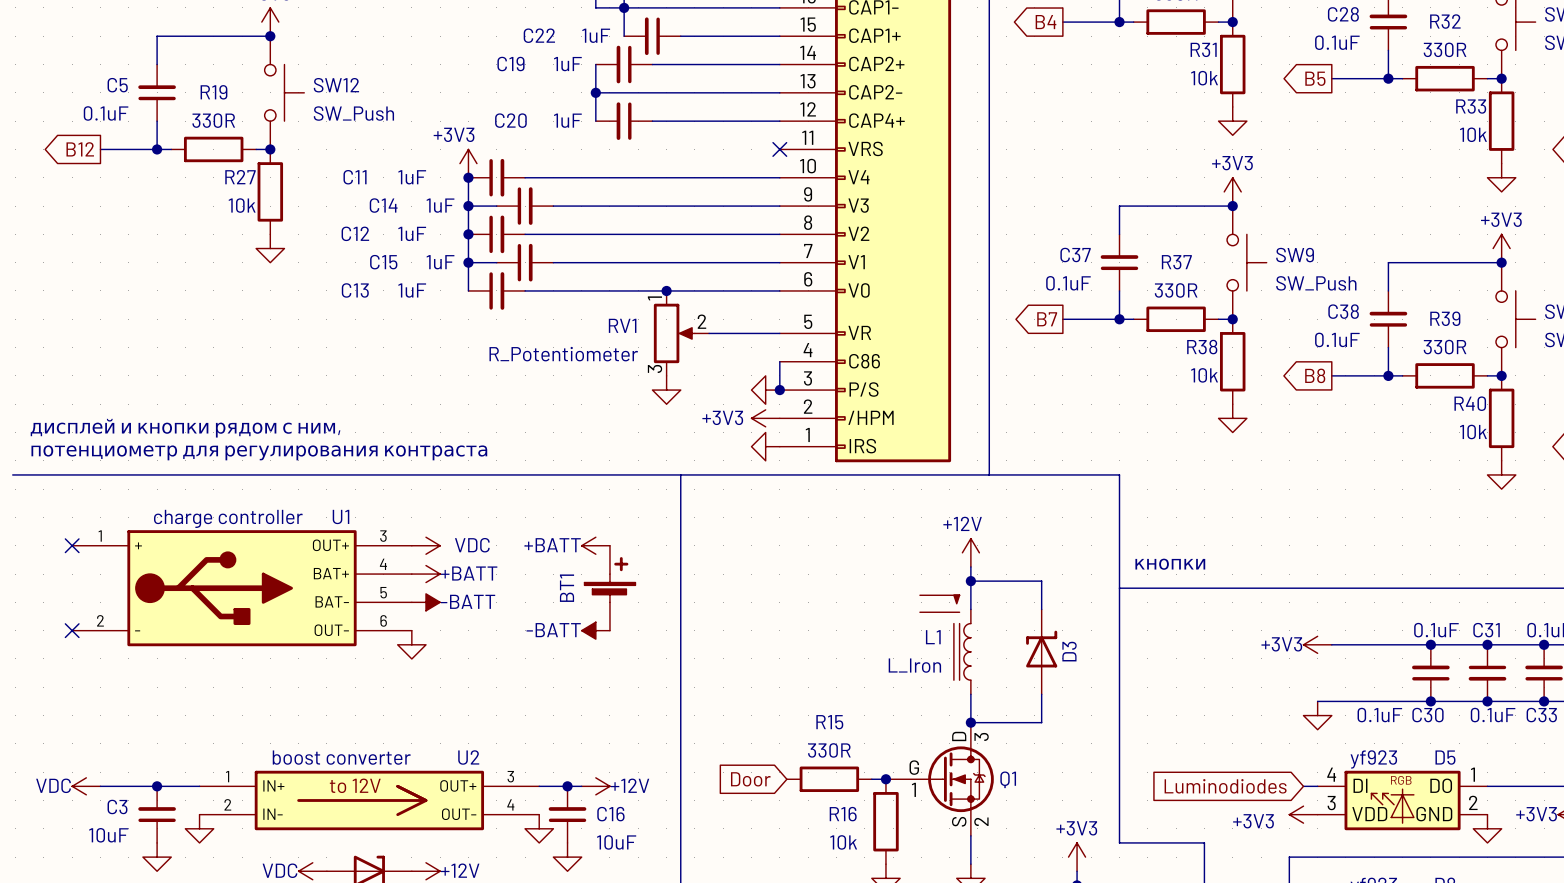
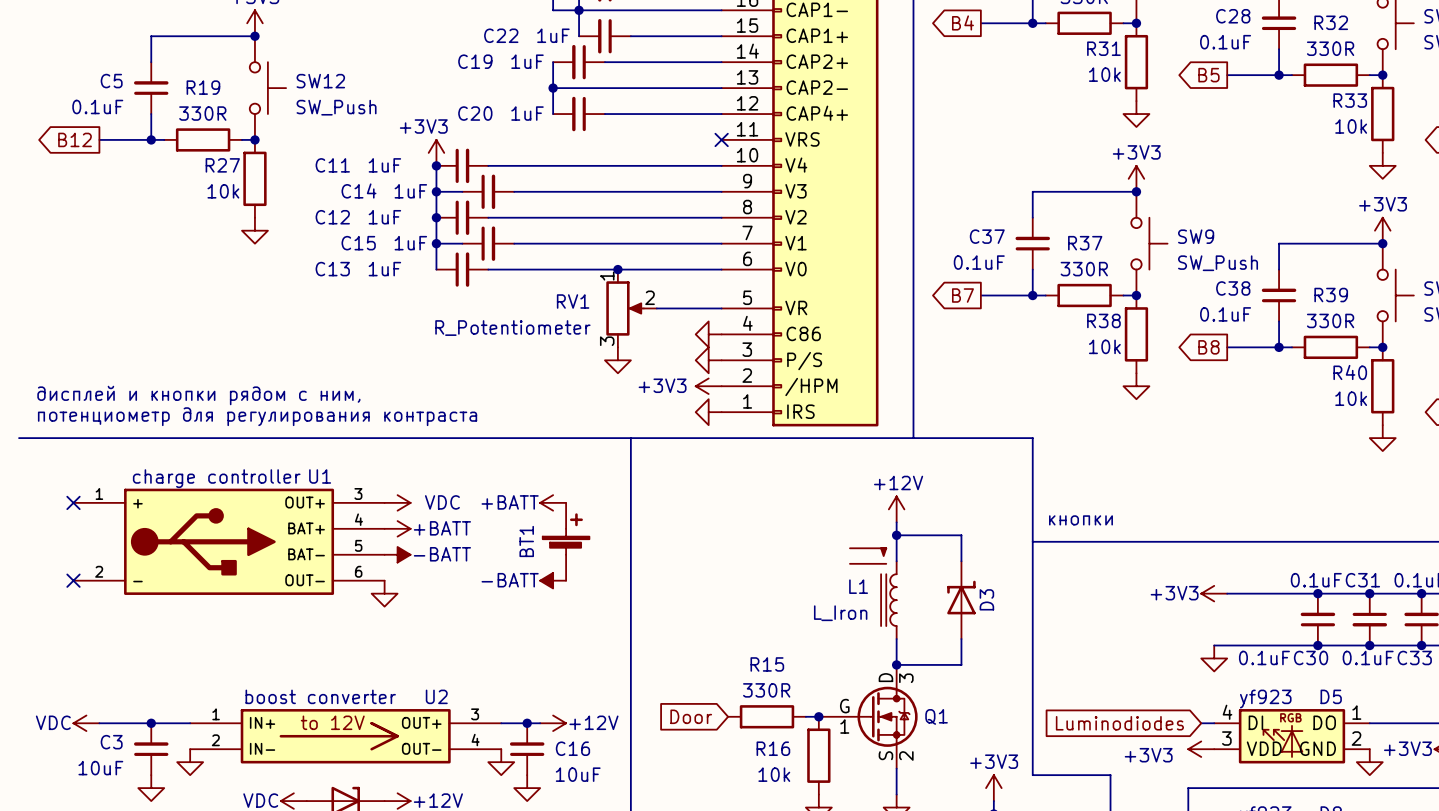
power symbol: none -> (708, 334)
wire: (779, 361) (779, 390) -> none
junction: (779, 390) -> none

